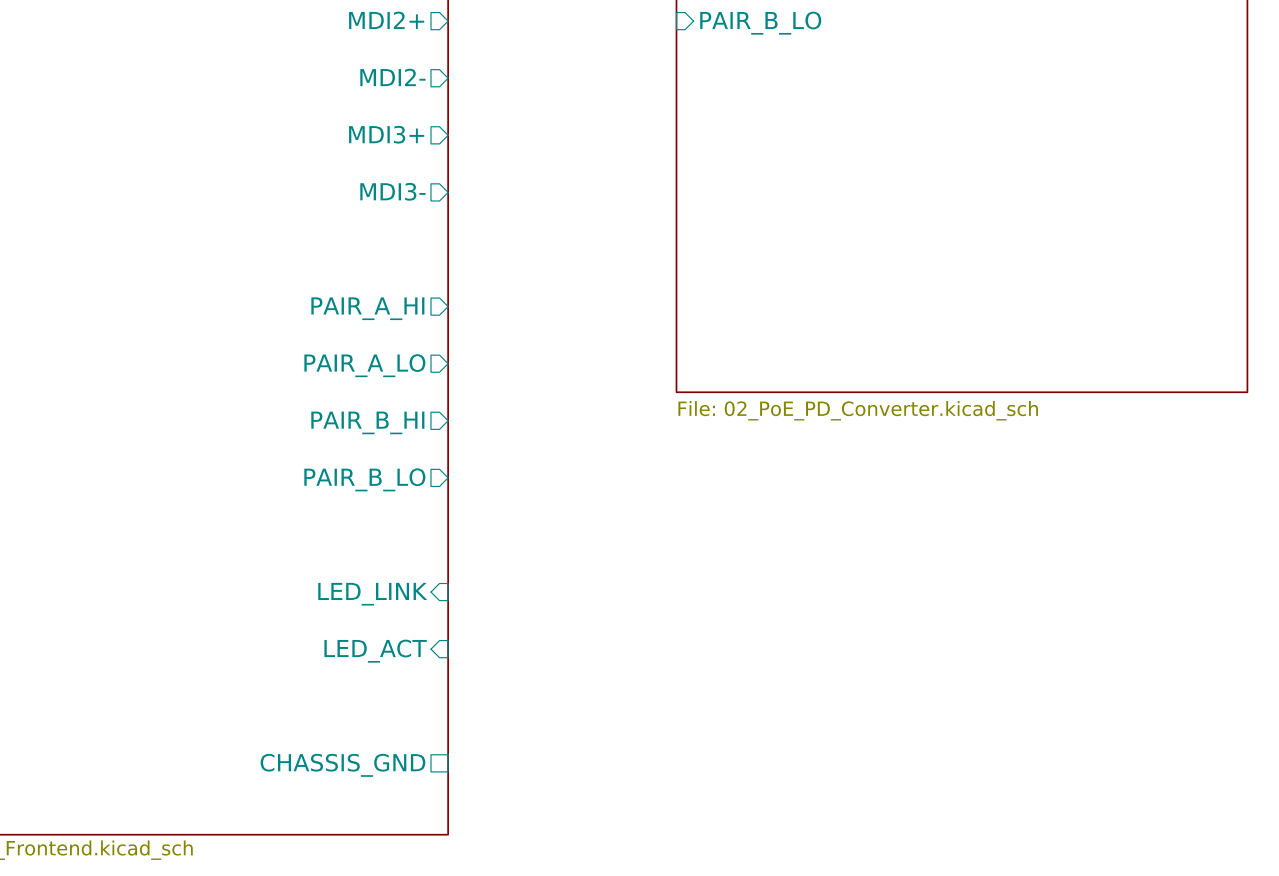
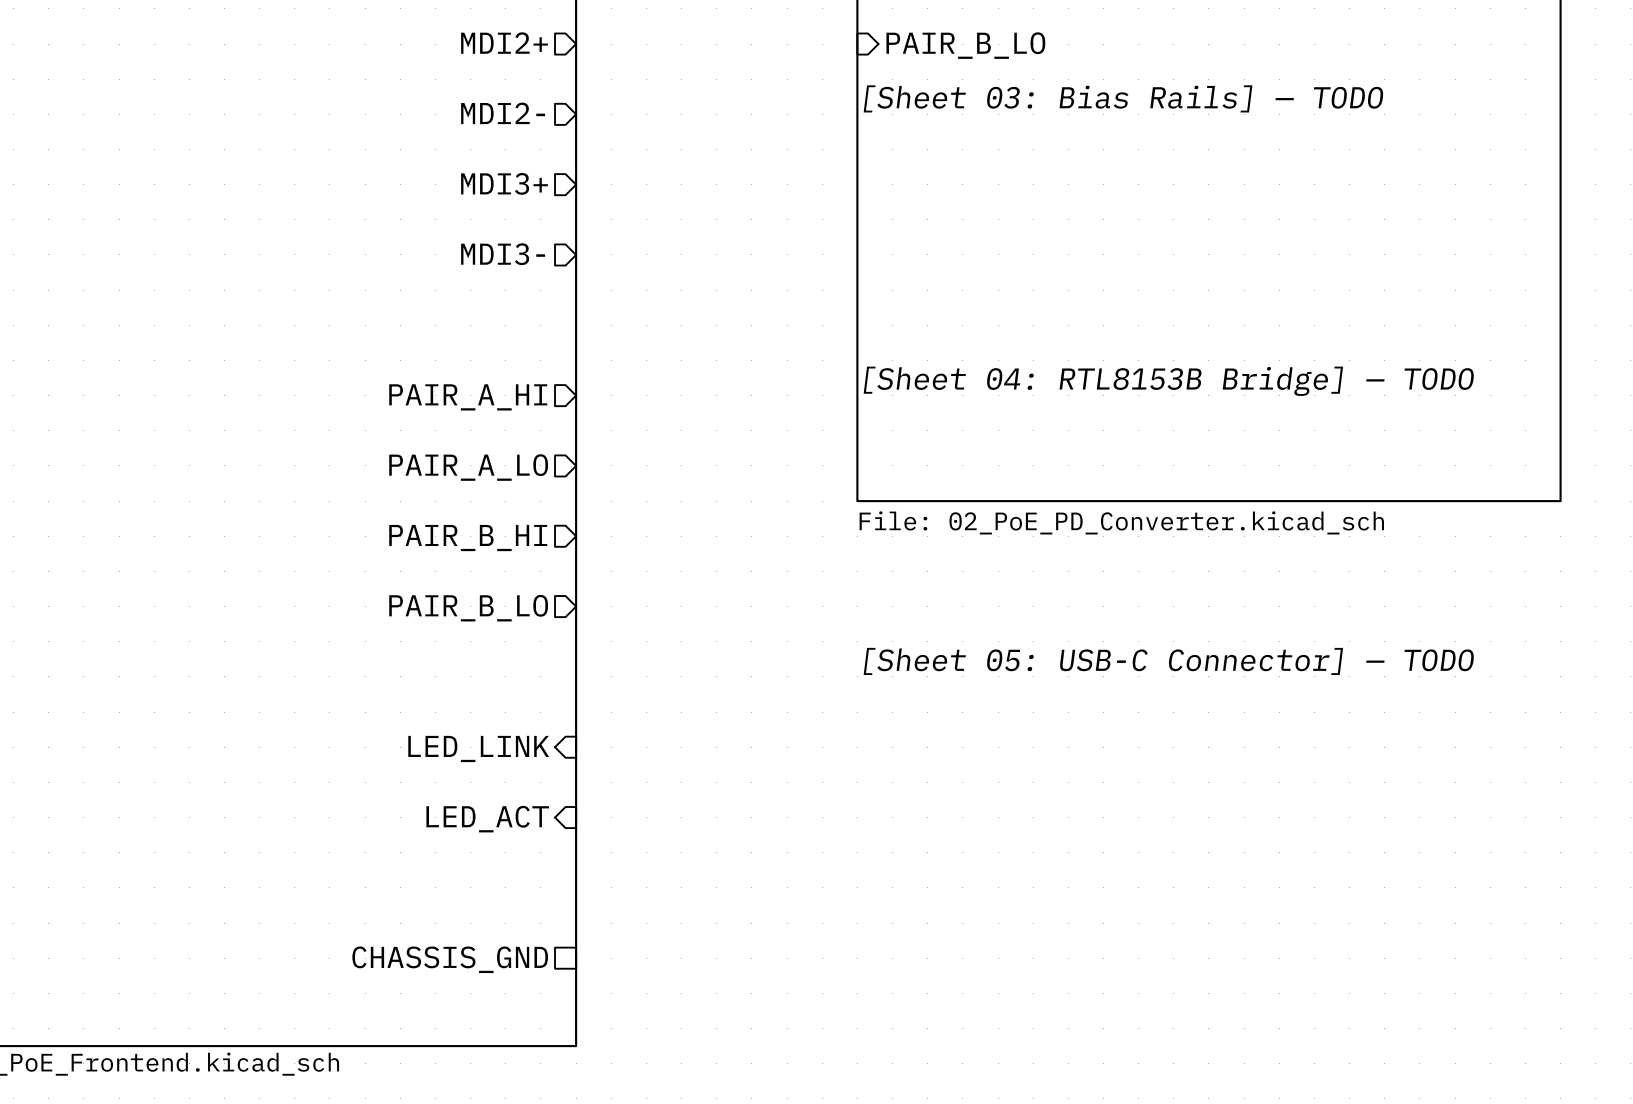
text: none -> [Sheet 03: Bias Rails] — TODO (1123, 98)
text: none -> [Sheet 04: RTL8153B Bridge] — TODO (1168, 381)
text: none -> [Sheet 05: USB-C Connector] — TODO (1168, 661)

